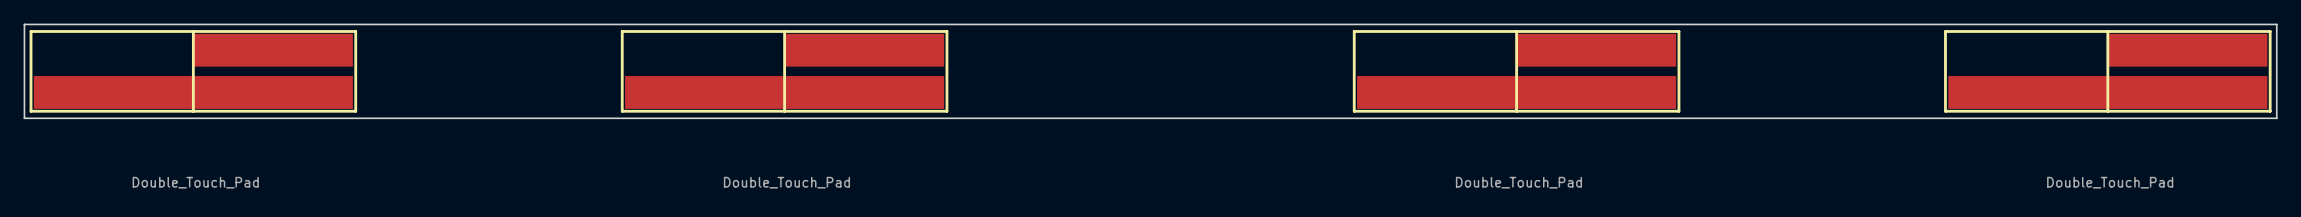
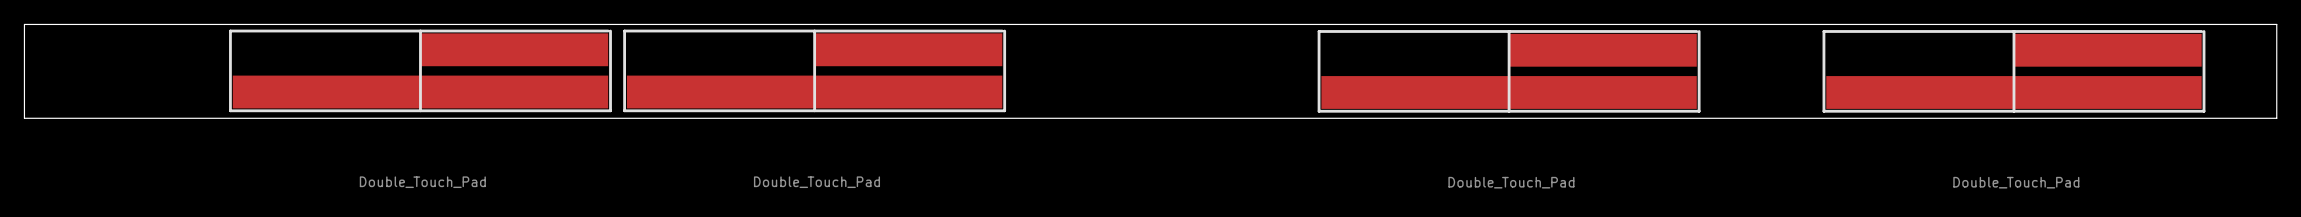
part footprint: [1352, 30, 1681, 113] -> [1317, 30, 1701, 113]
part: none -> Double_Touch_Pad (420, 70)
part: none -> Double_Touch_Pad (814, 70)
part: Double_Touch_Pad (193, 71) -> none
part: Double_Touch_Pad (784, 71) -> none
part: none -> Double_Touch_Pad (2013, 71)
part: Double_Touch_Pad (2107, 71) -> none

